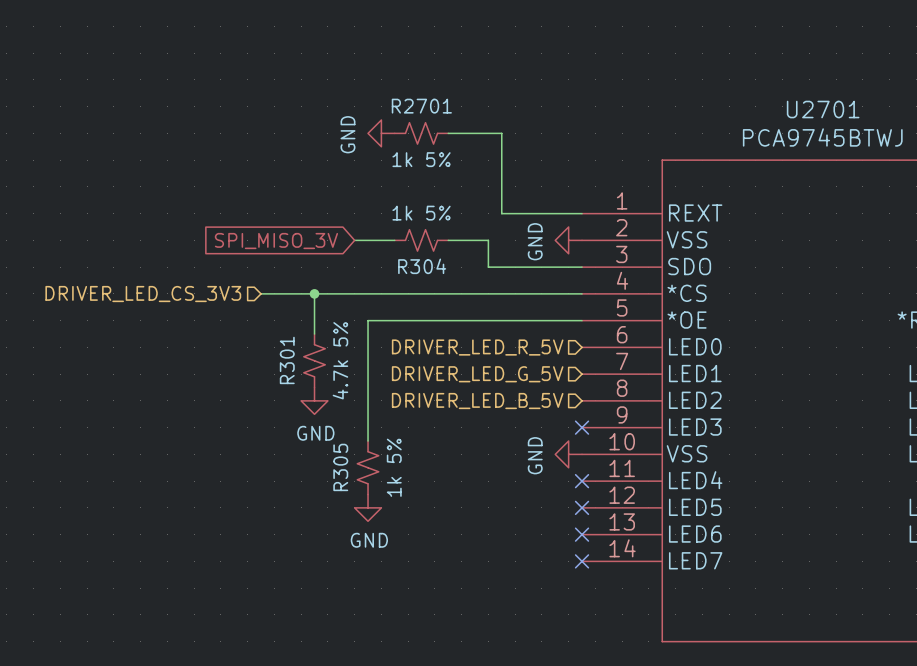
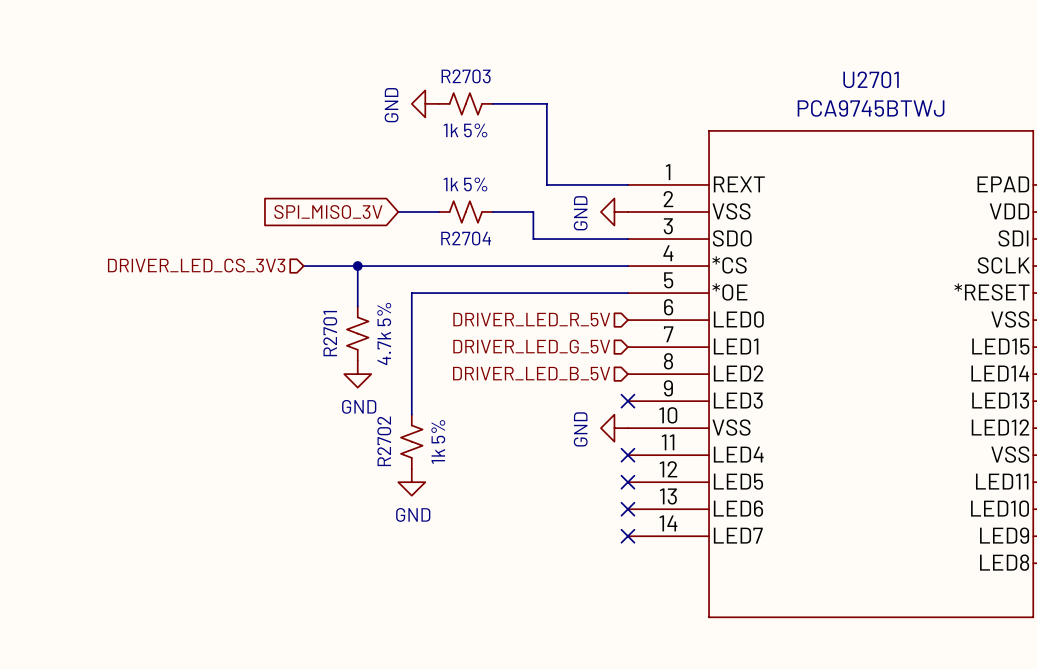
R2701 name: R2701 (421, 106) -> R2703 (466, 76)
R304 name: R304 (422, 266) -> R2704 (466, 238)
R301 name: R301 (287, 360) -> R2701 (330, 333)
R305 name: R305 (340, 467) -> R2702 (384, 441)

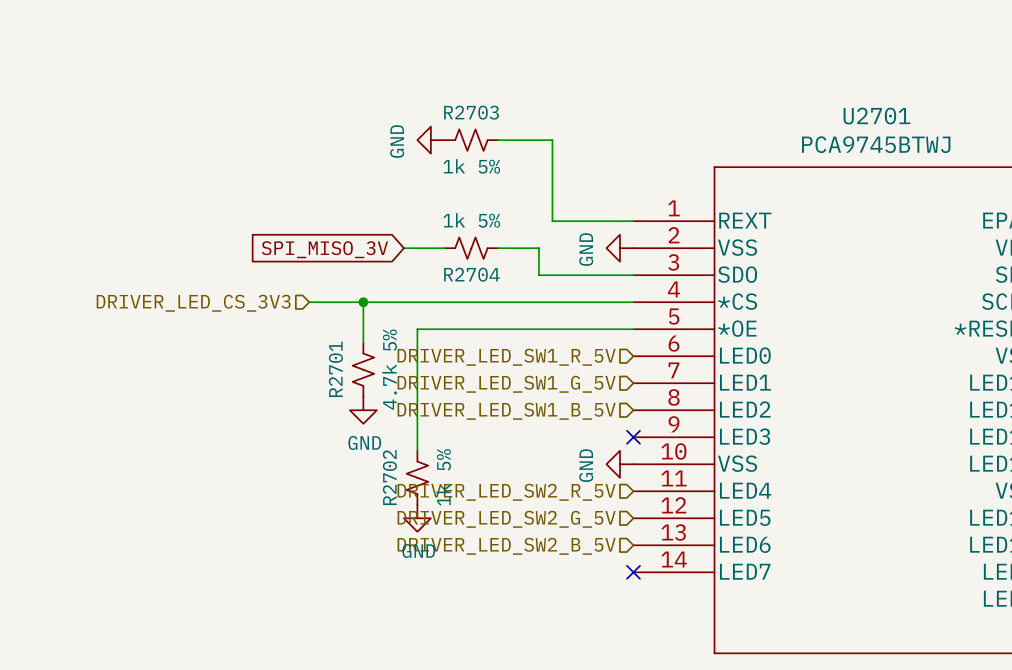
hierarchical label: DRIVER_LED_R_5V (531, 319) -> DRIVER_LED_SW1_R_5V (506, 357)
hierarchical label: DRIVER_LED_G_5V (531, 346) -> DRIVER_LED_SW1_G_5V (506, 384)
hierarchical label: DRIVER_LED_B_5V (531, 373) -> DRIVER_LED_SW1_B_5V (506, 411)
hierarchical label: none -> DRIVER_LED_SW2_R_5V (506, 492)
no-connect mark: (627, 455) -> none
hierarchical label: none -> DRIVER_LED_SW2_G_5V (506, 519)
no-connect mark: (627, 482) -> none
hierarchical label: none -> DRIVER_LED_SW2_B_5V (506, 546)
no-connect mark: (627, 509) -> none

